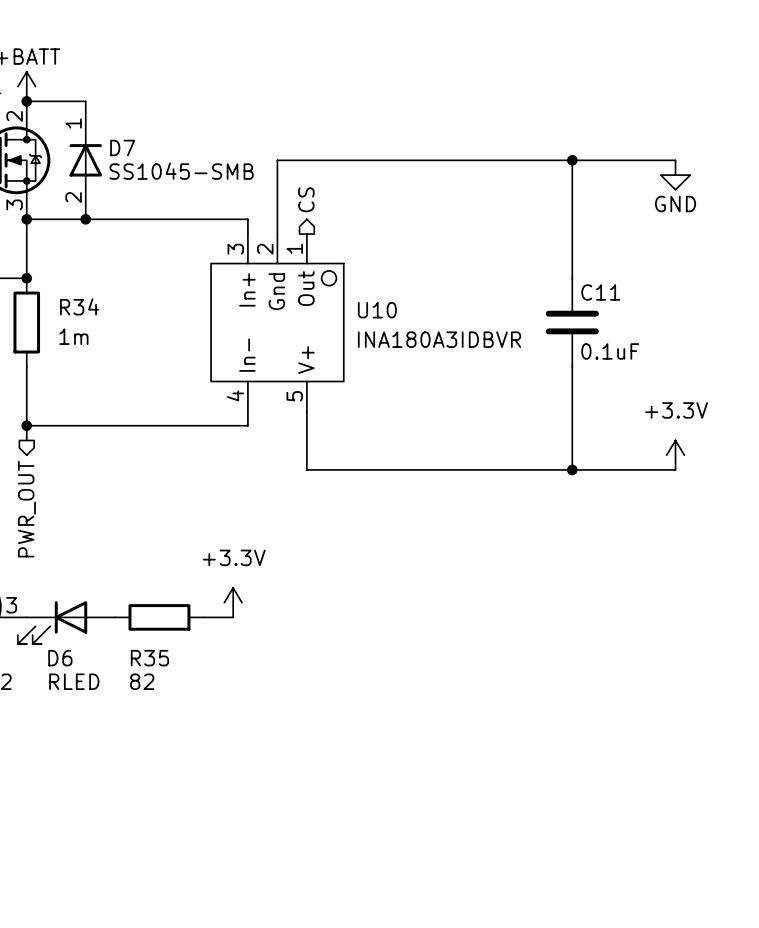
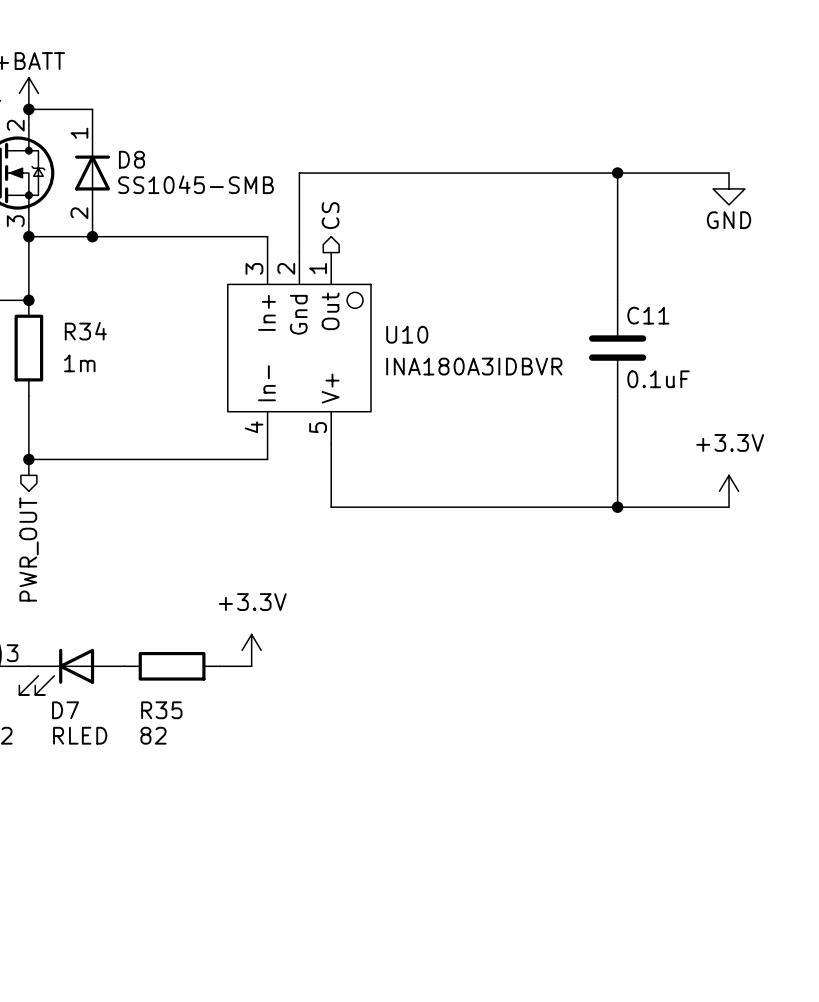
D7 name: D7 (122, 147) -> D8 (131, 159)
D6 name: D6 (60, 658) -> D7 (65, 710)

